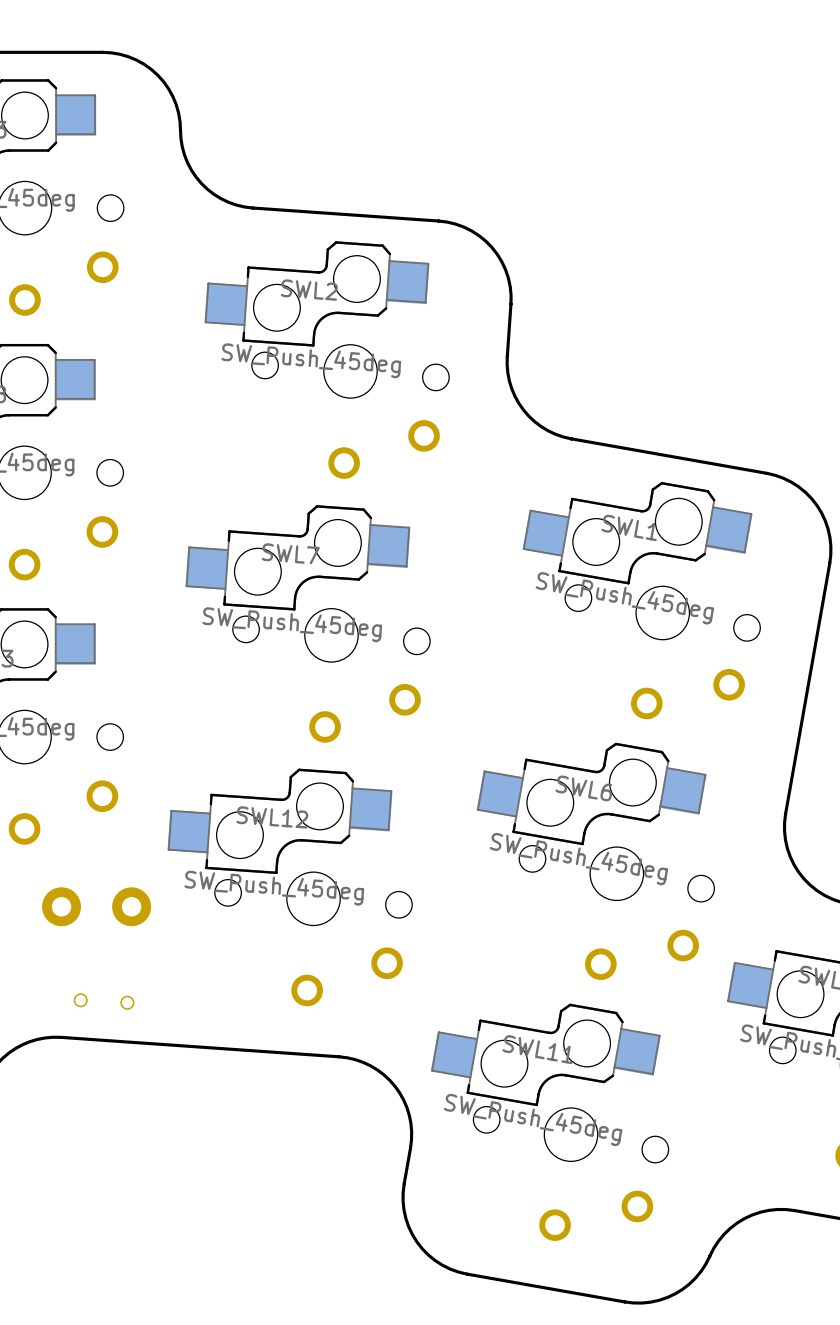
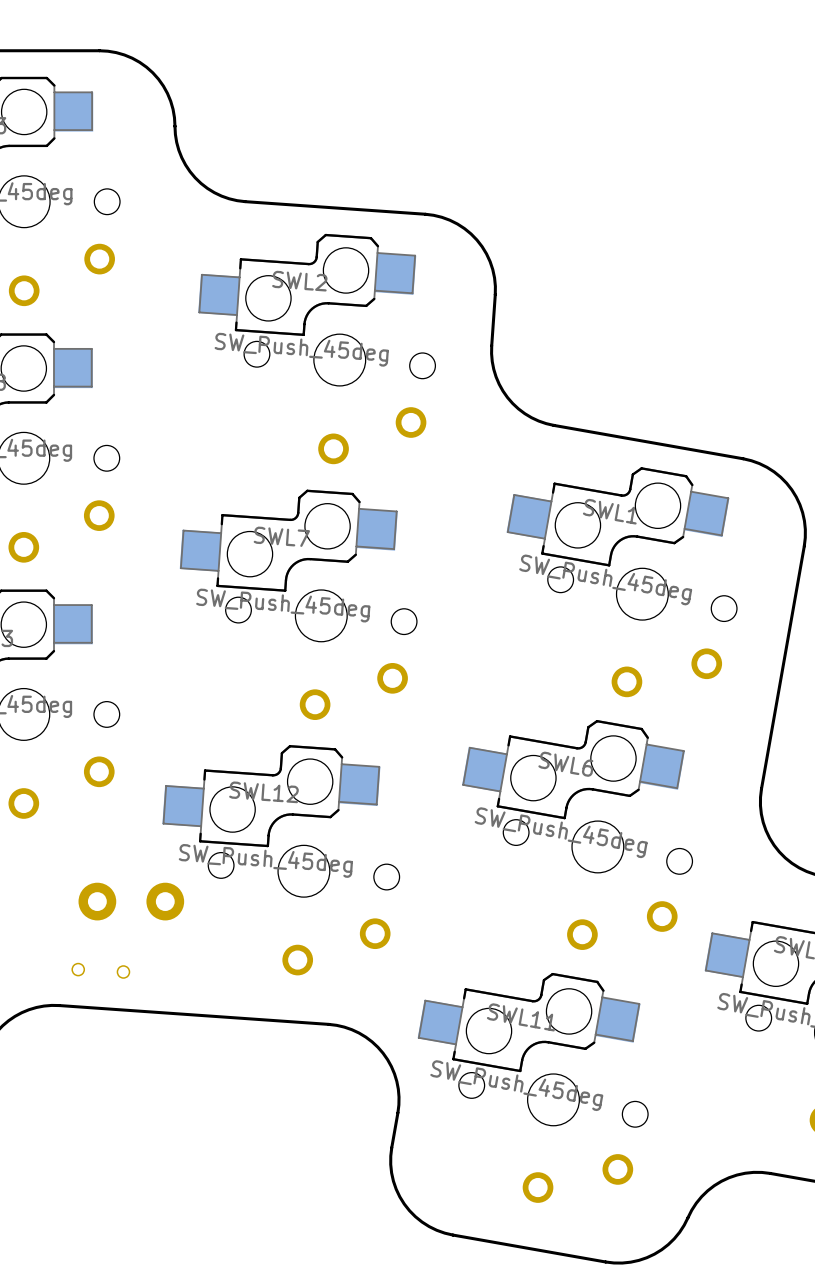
part: (61, 906) -> none
part: (131, 906) -> none
part: none -> (97, 901)
part: none -> (165, 901)

